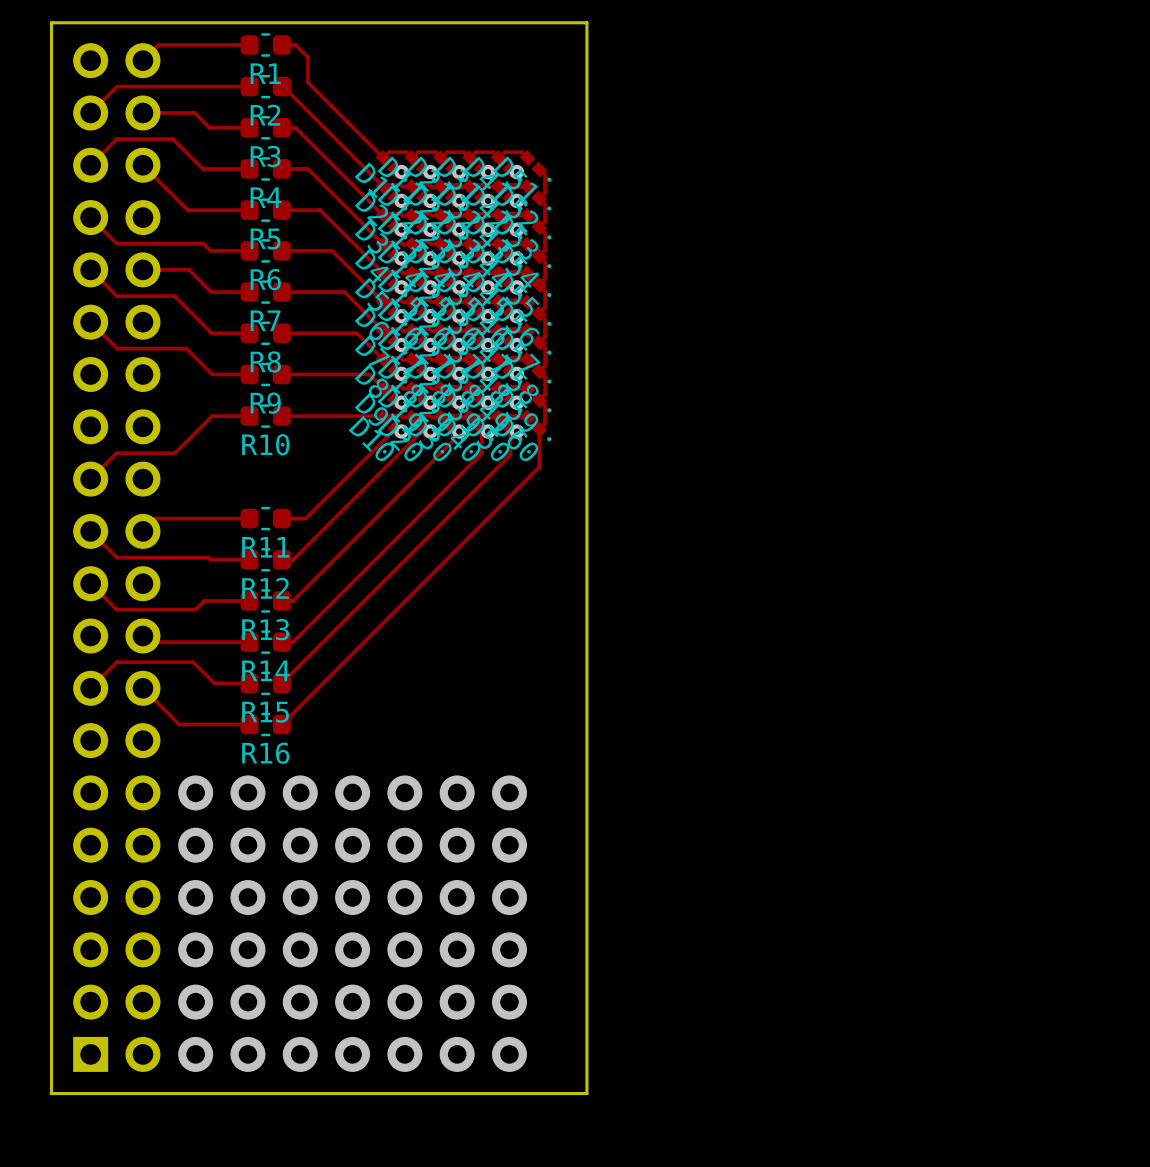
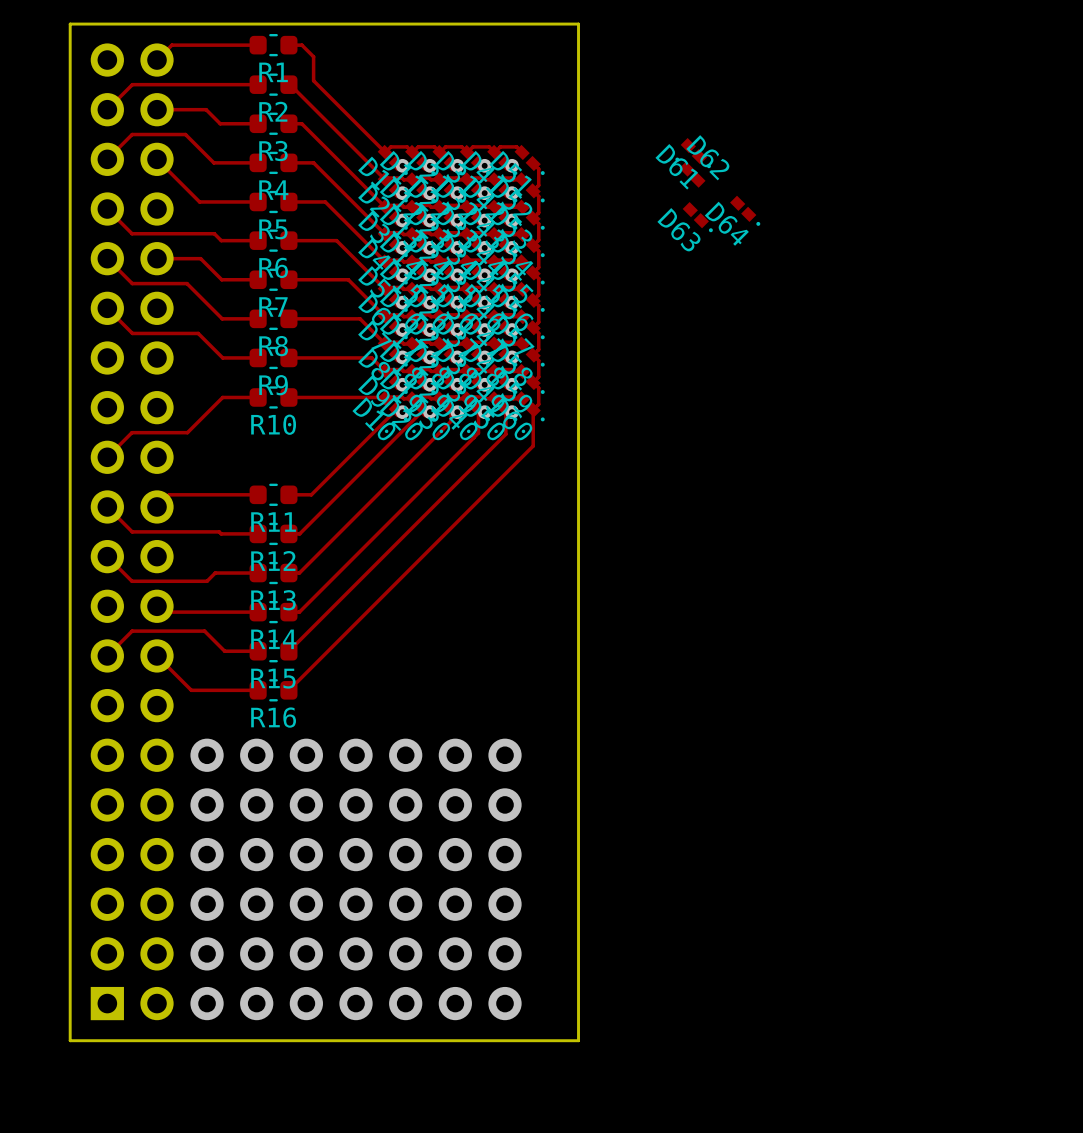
D61: none -> (695, 153)
D62: none -> (690, 172)
D64: none -> (745, 210)
D63: none -> (697, 217)

